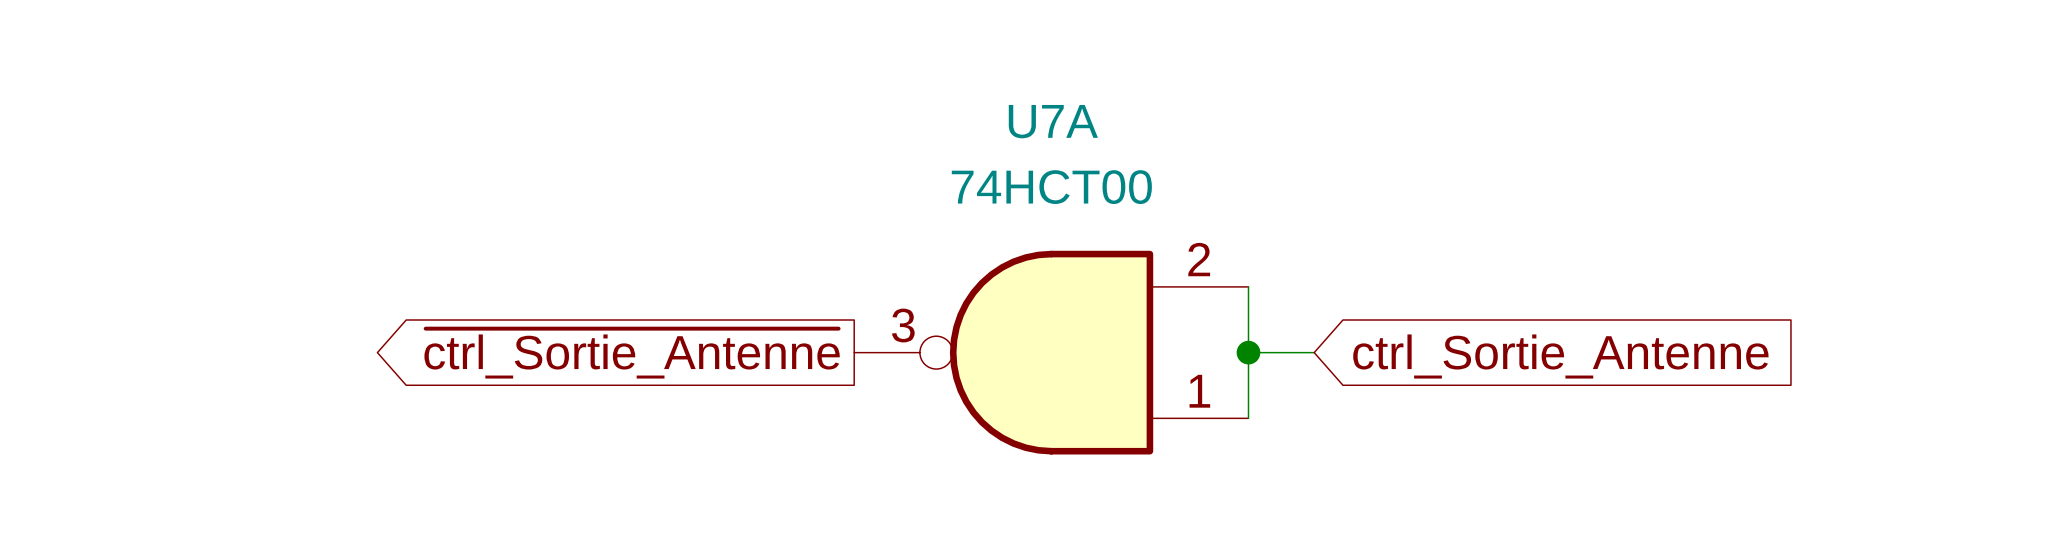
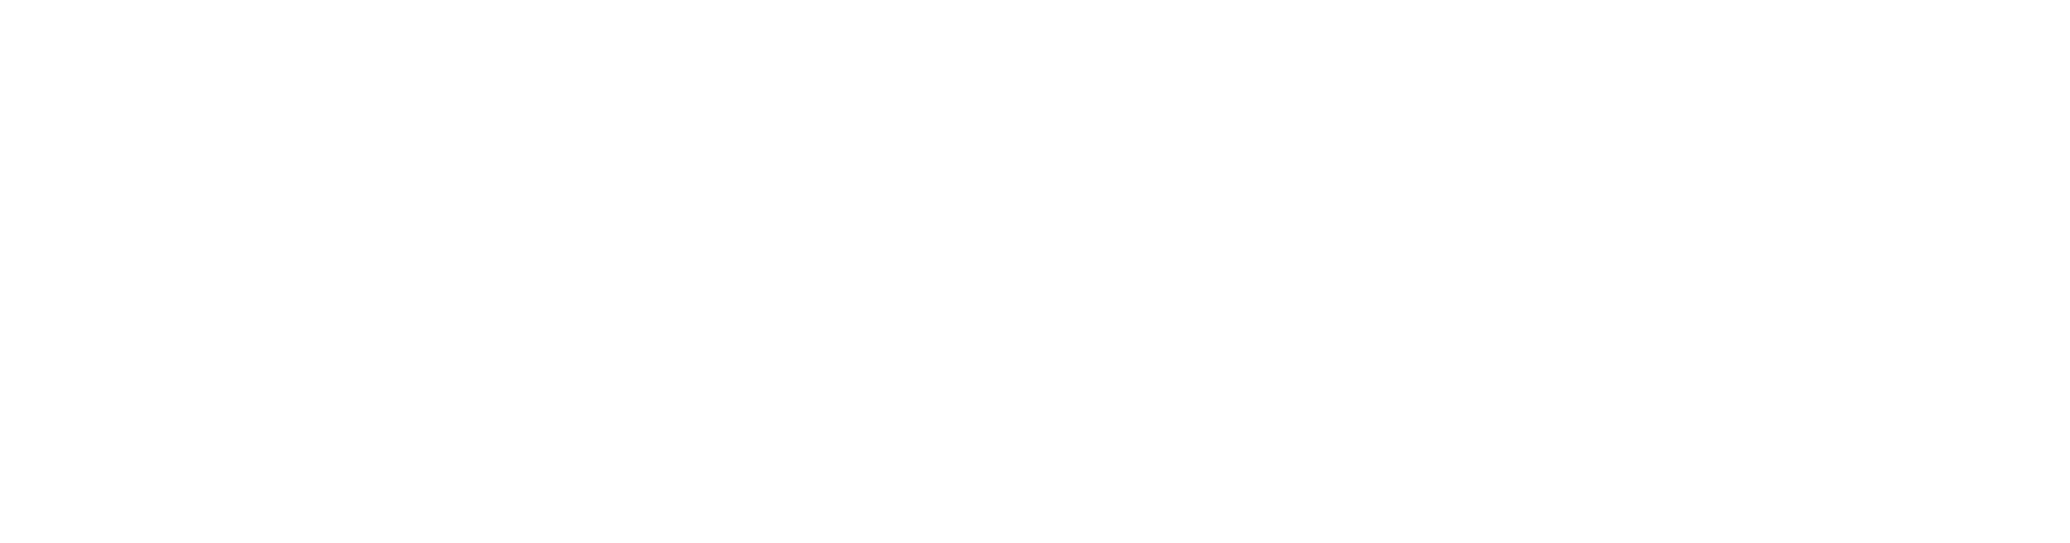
wire: (1248, 286) (1248, 418) -> none
U7A: 74HCT00 (1051, 352) -> none
wire: (1248, 352) (1314, 352) -> none
junction: (1248, 352) -> none
global label: ~{ctrl_Sortie_Antenne} (632, 353) -> none
global label: ctrl_Sortie_Antenne (1560, 356) -> none

